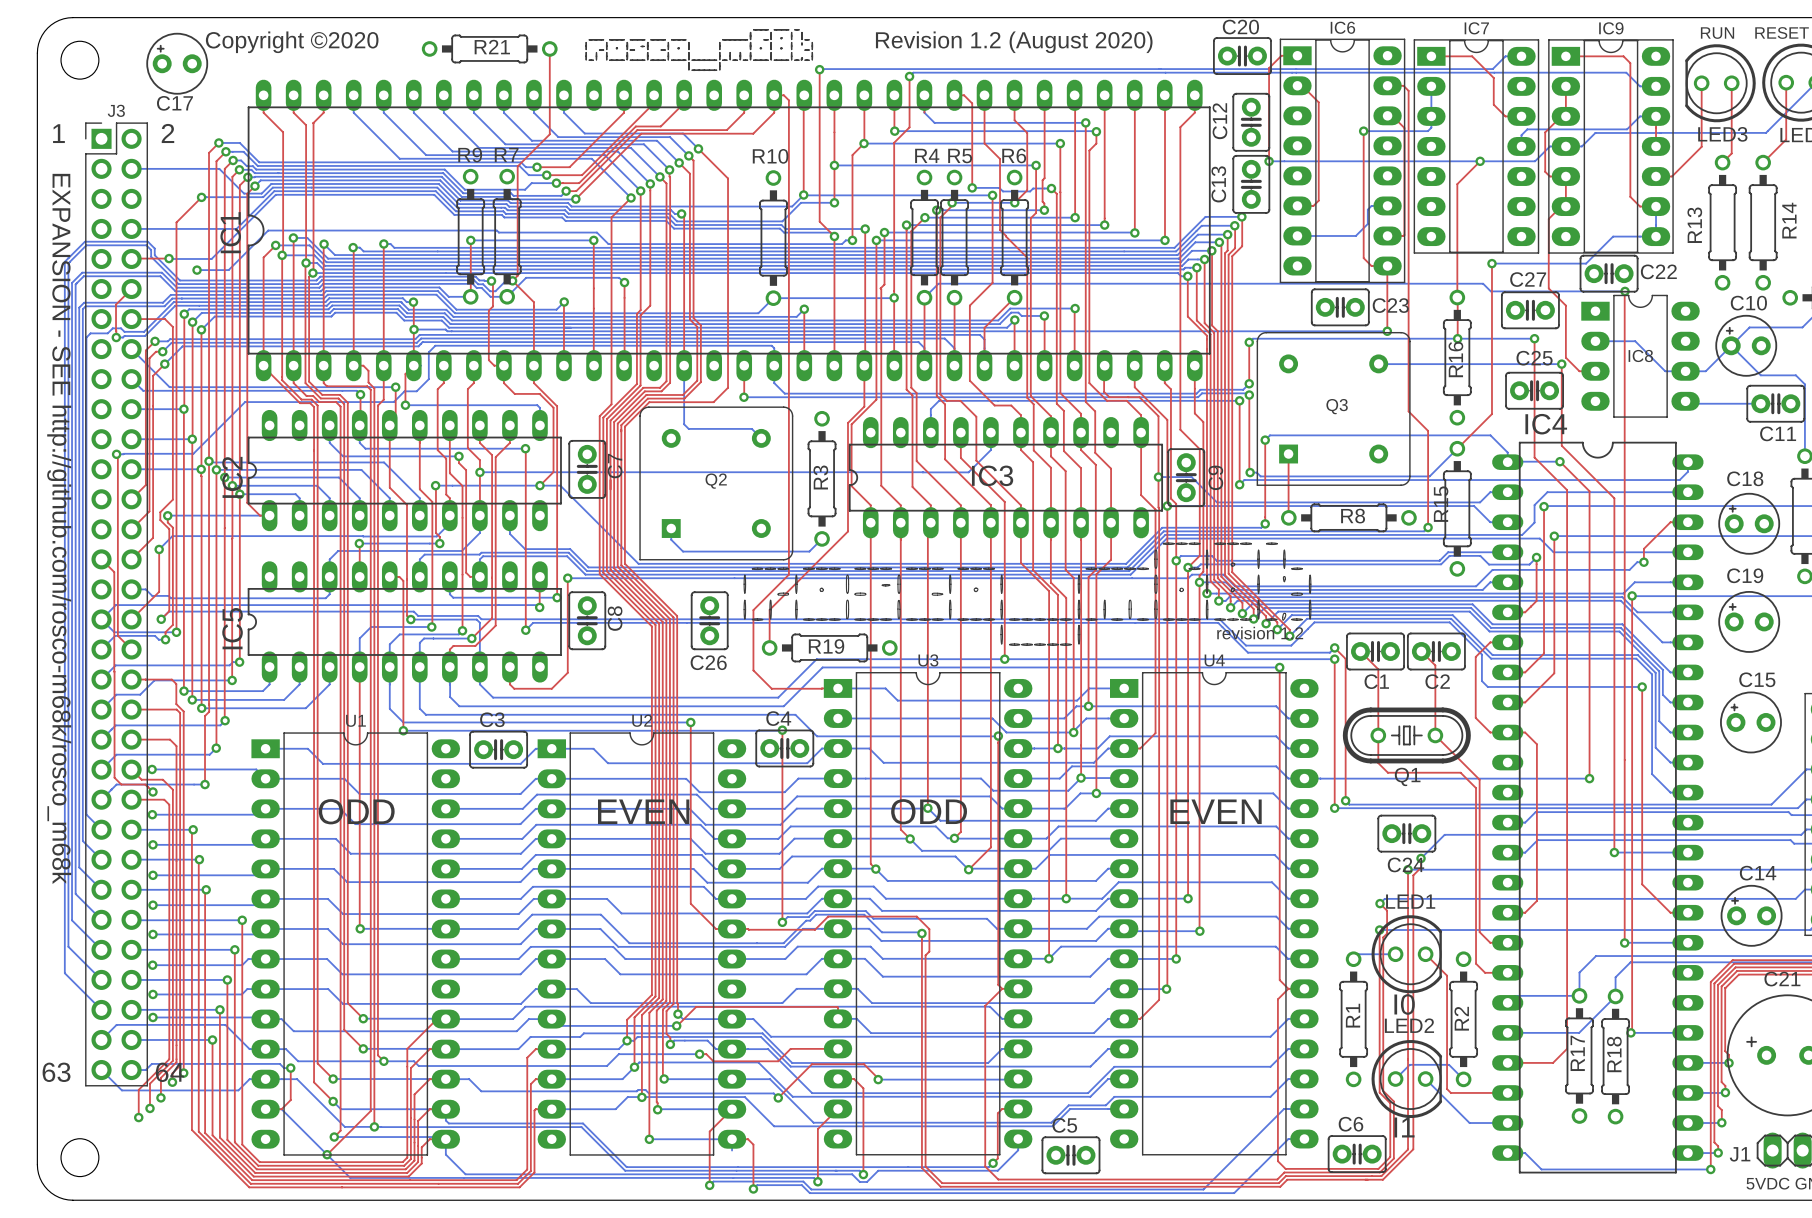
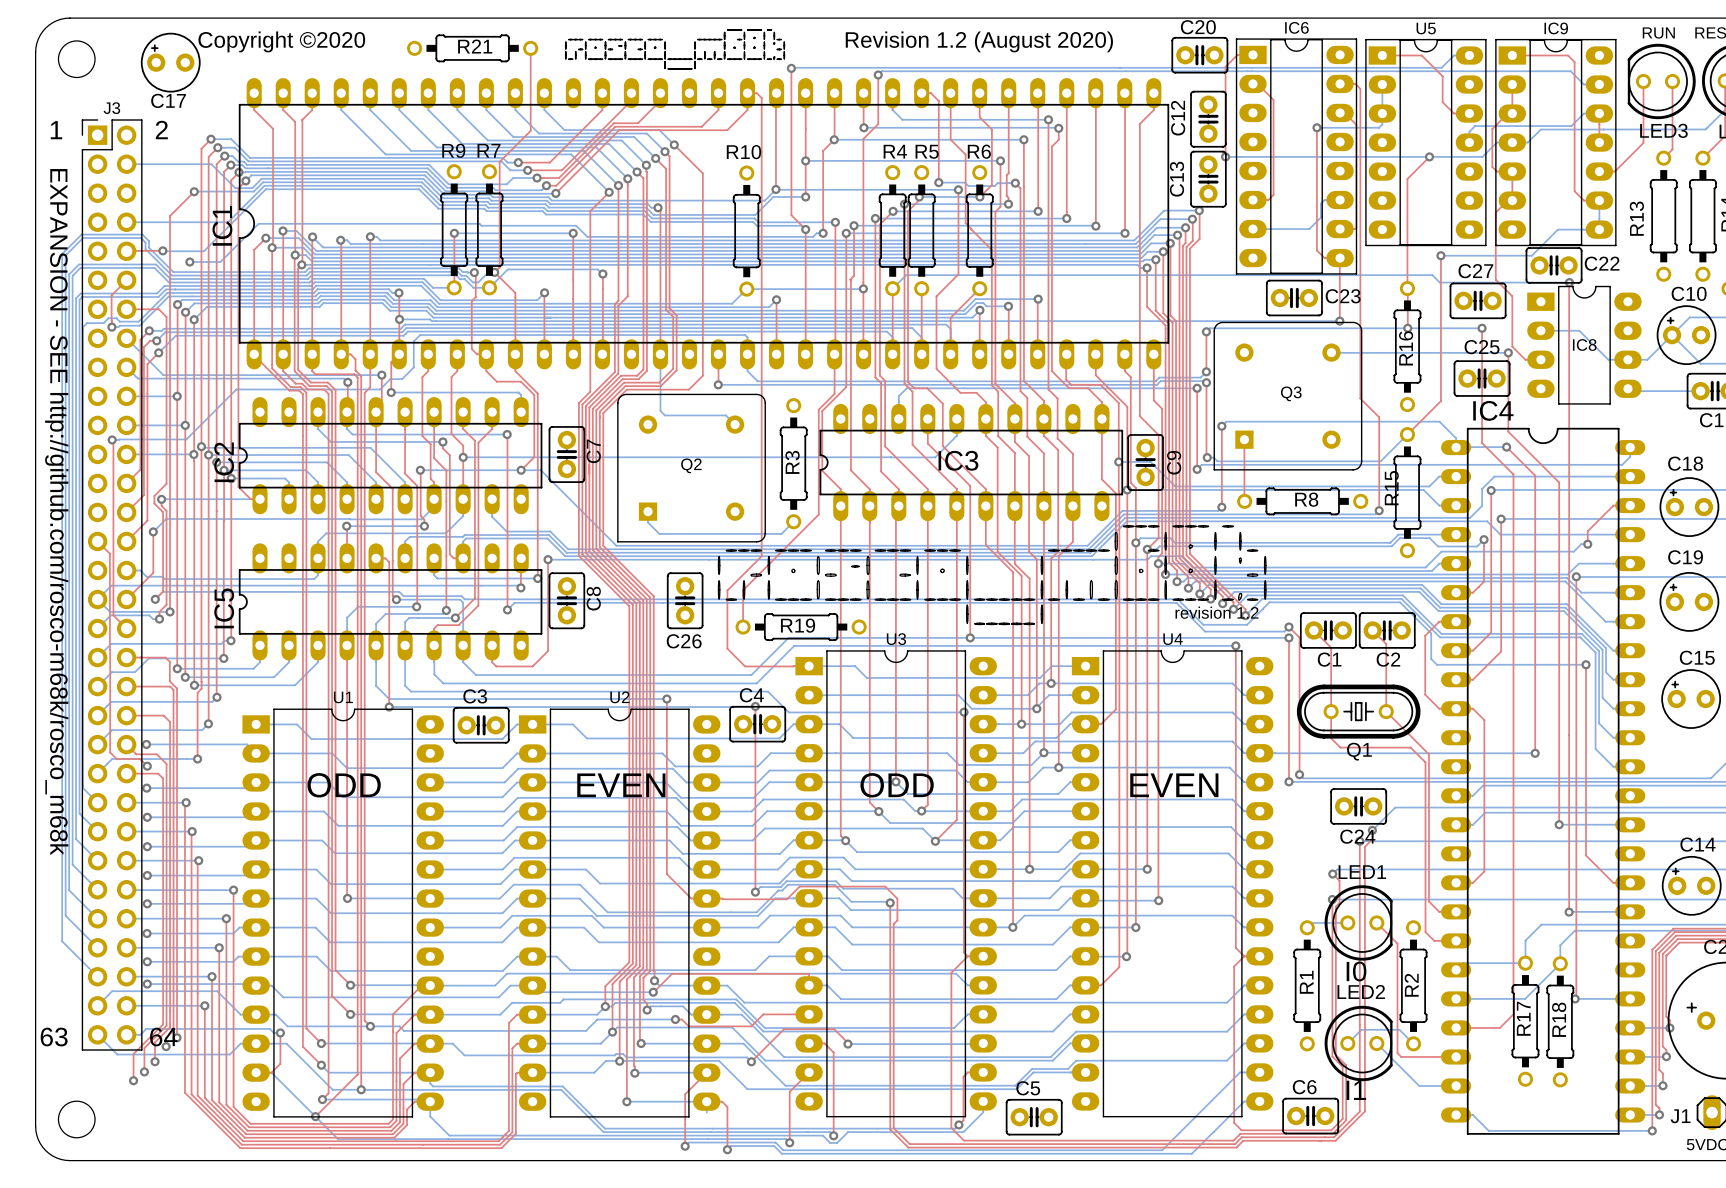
IC7 name: IC7 (1476, 28) -> U5 (1426, 28)

